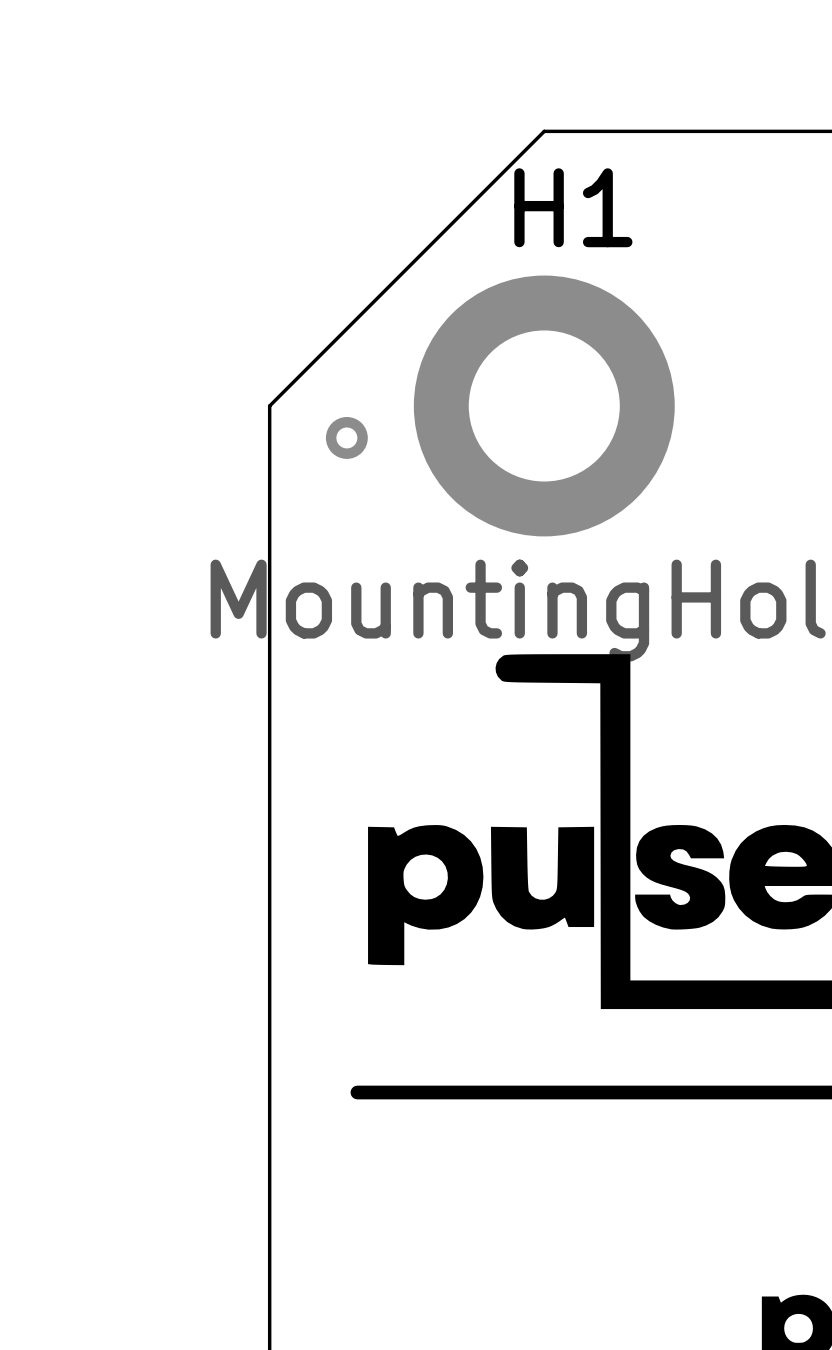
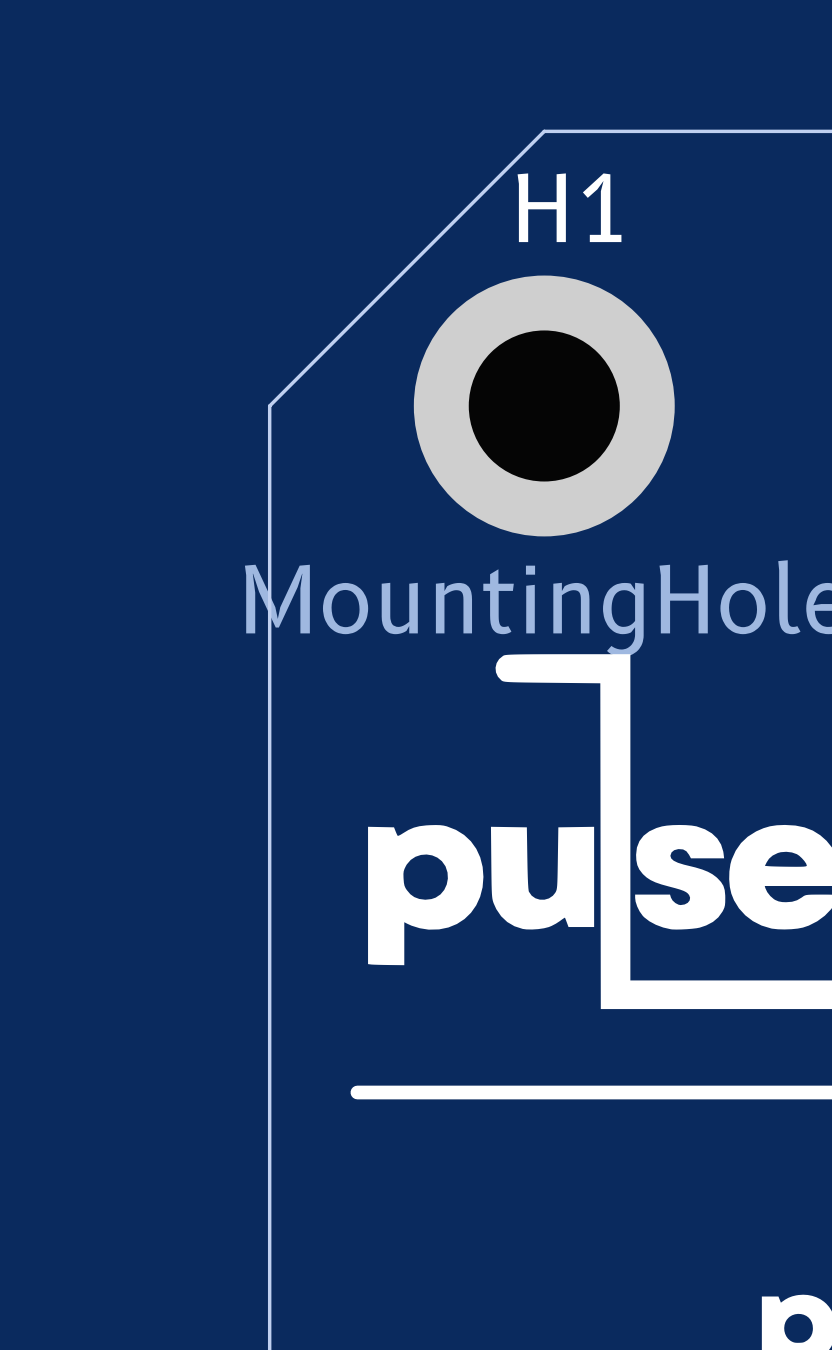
via: (346, 437) -> none

